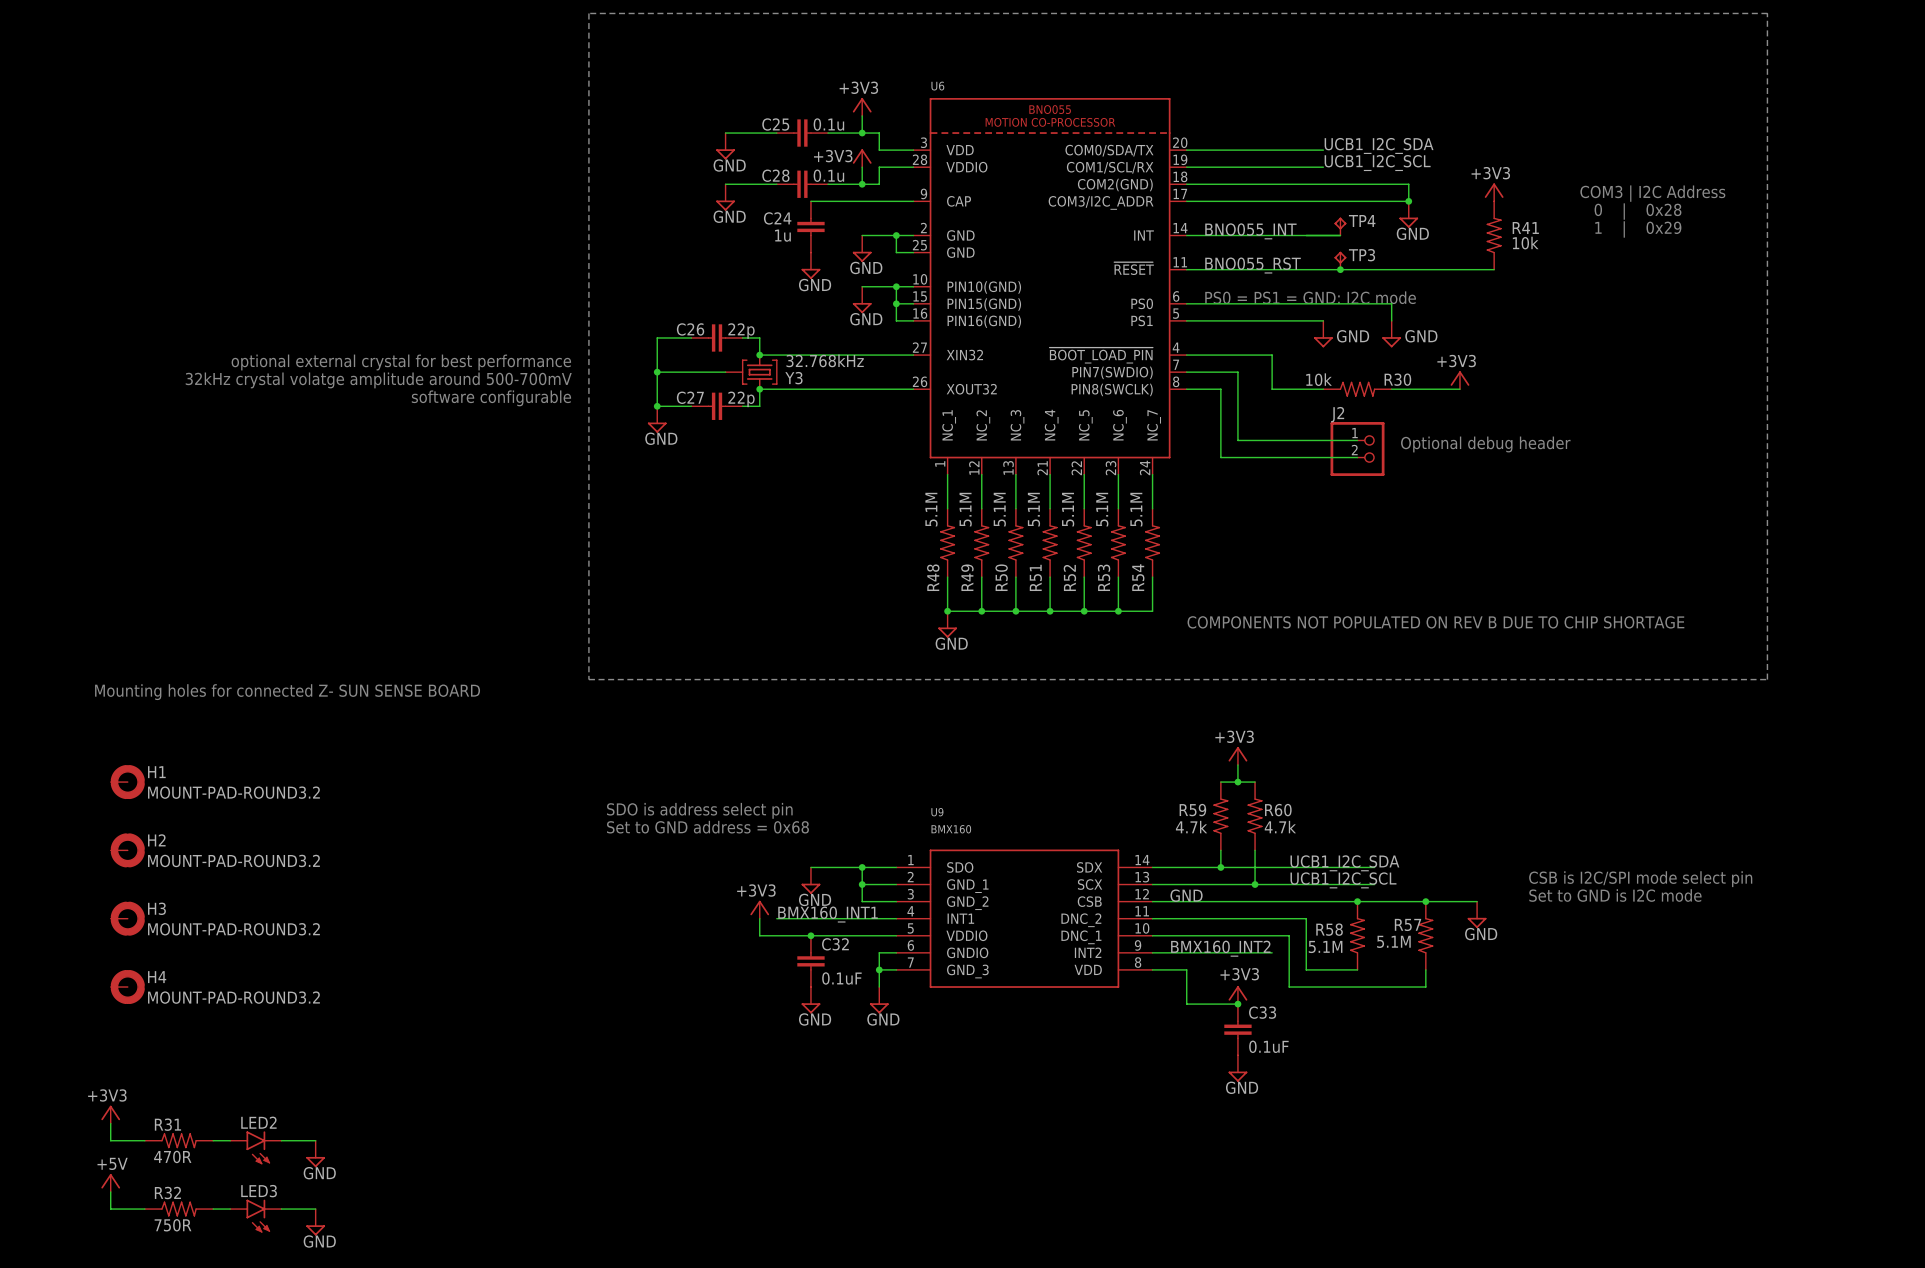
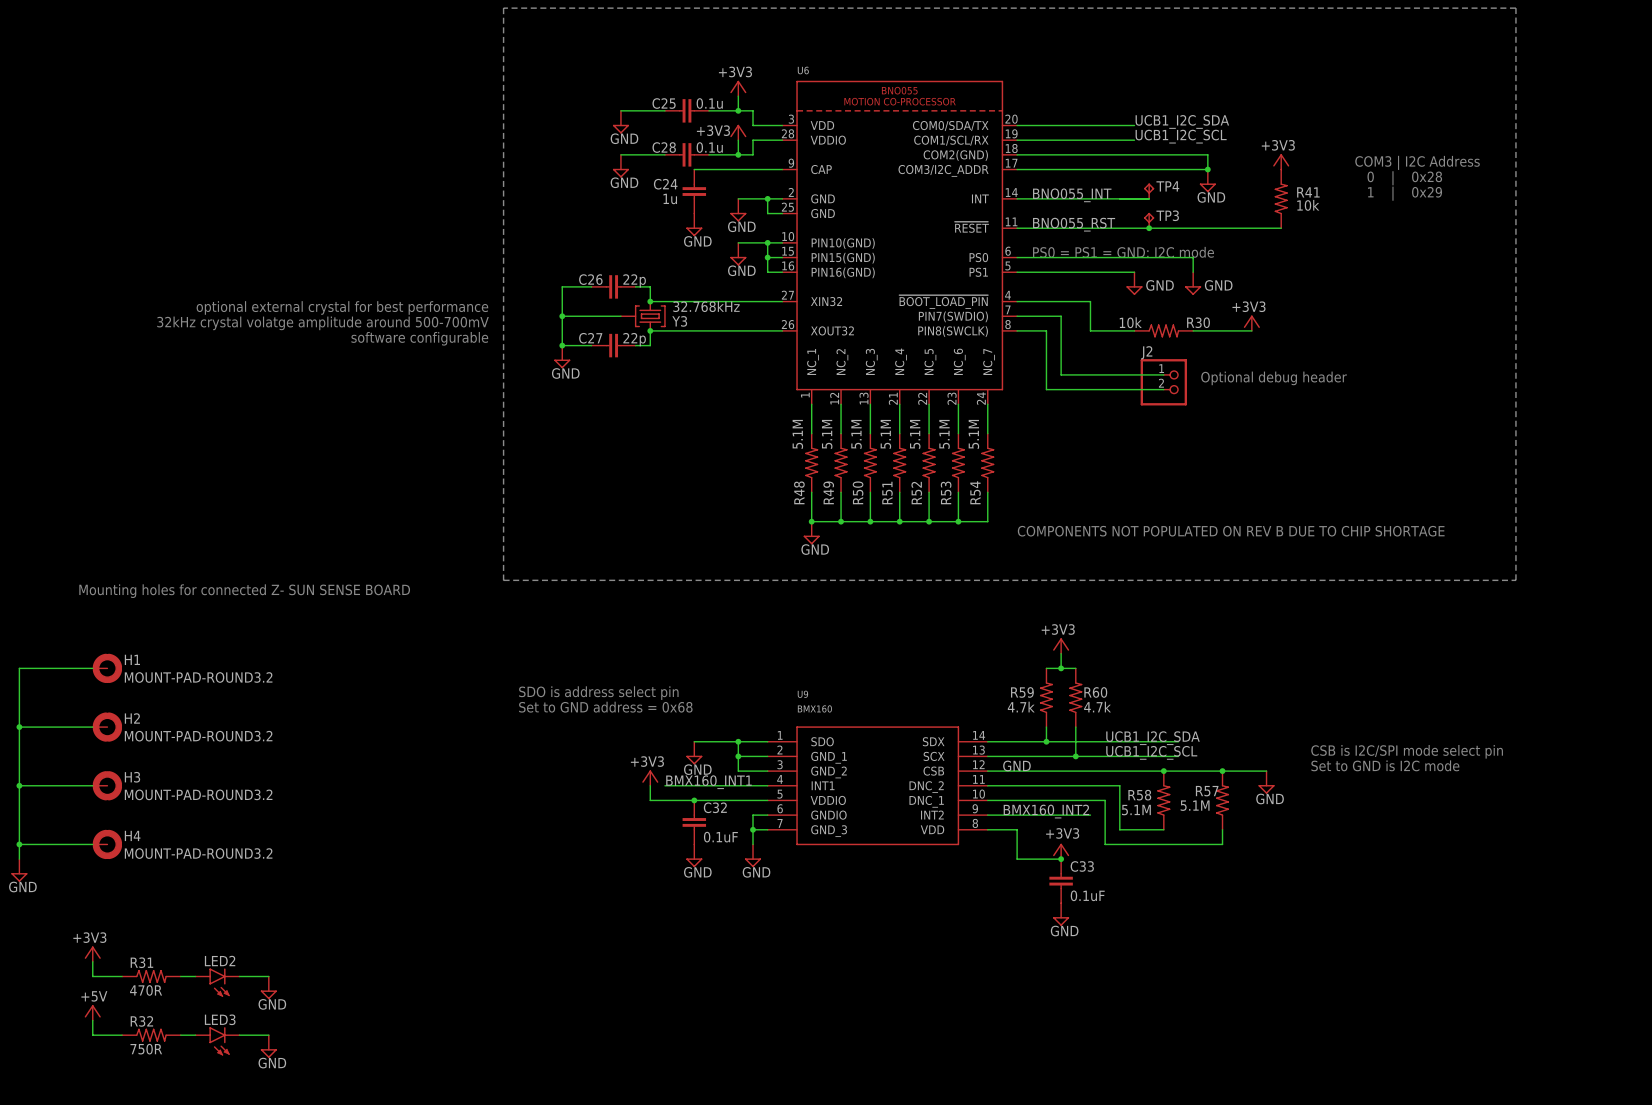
wire: none -> (92, 668) (19, 668) (19, 859)
wire: none -> (19, 727) (92, 727)
junction: none -> (19, 727)
wire: none -> (19, 785) (92, 785)
junction: none -> (19, 785)
wire: none -> (19, 844) (92, 844)
junction: none -> (19, 844)
power symbol: none -> GND (19, 870)

